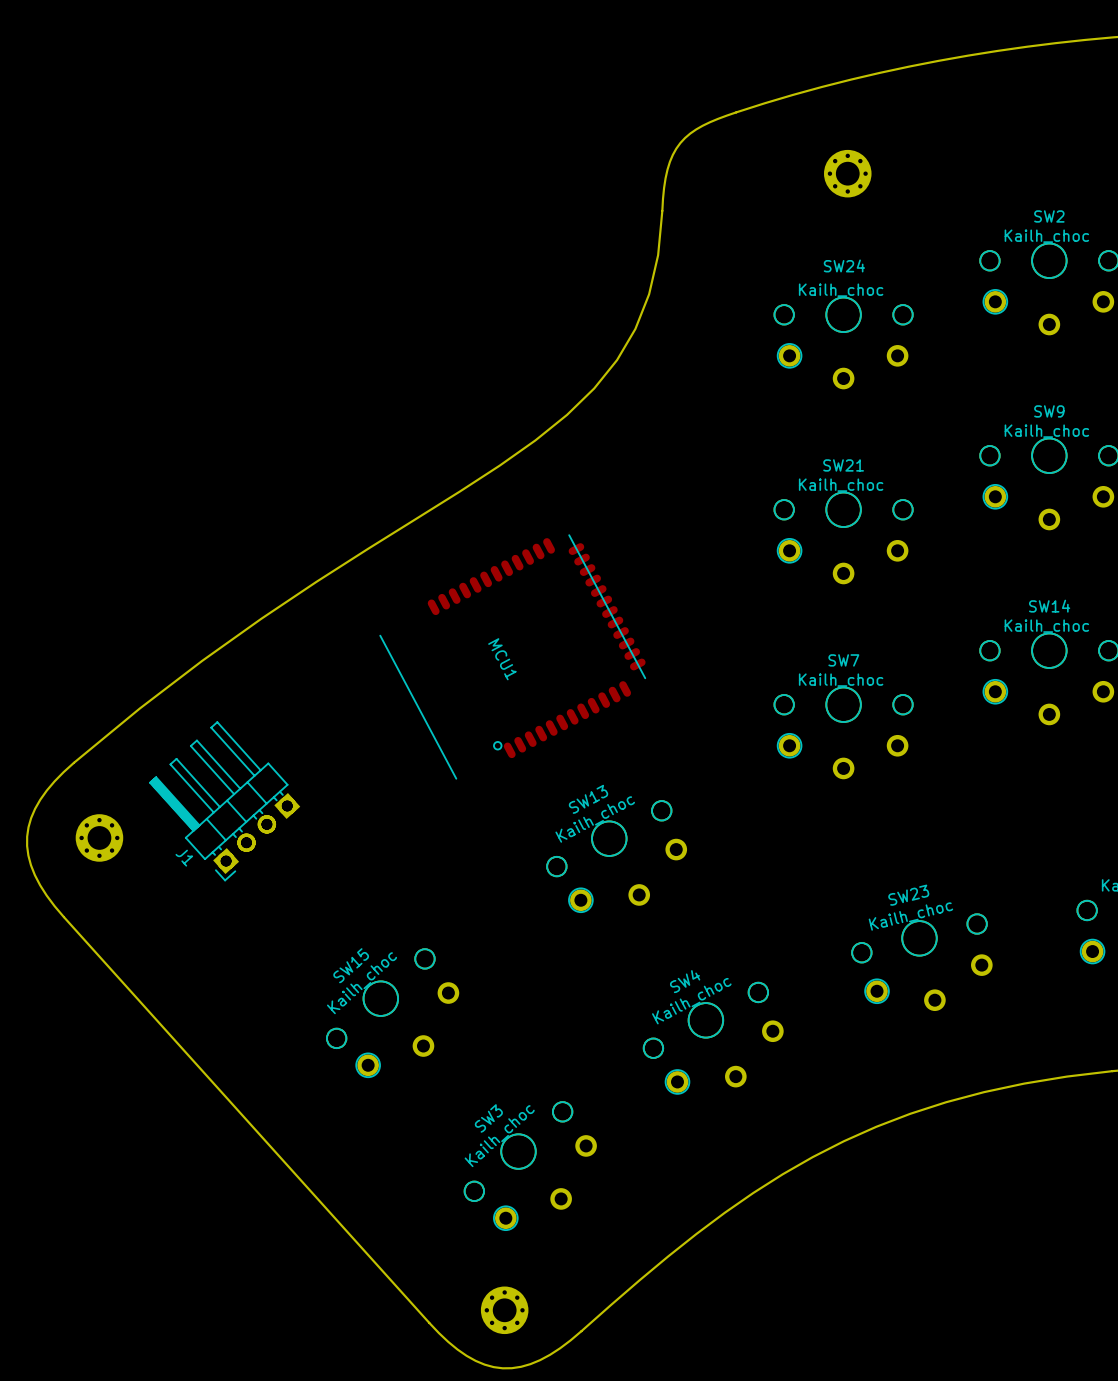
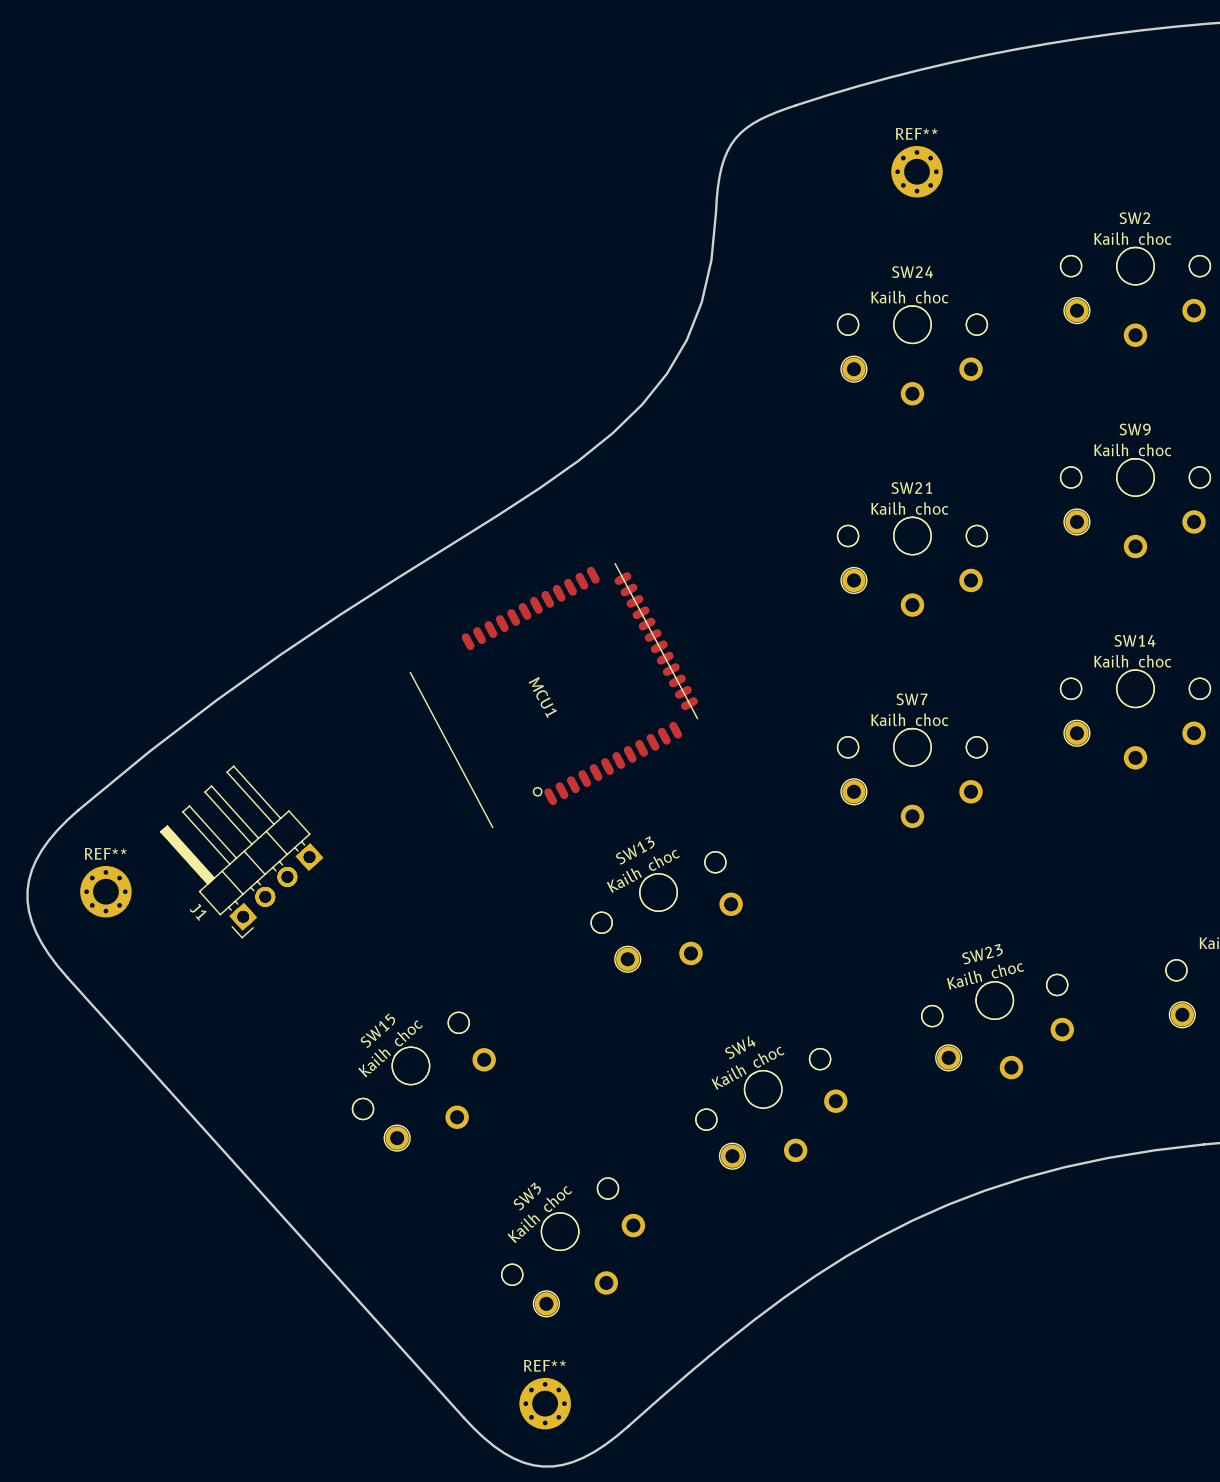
REF** name: none -> REF** (916, 133)
REF** name: none -> REF** (105, 853)
REF** name: none -> REF** (544, 1365)

